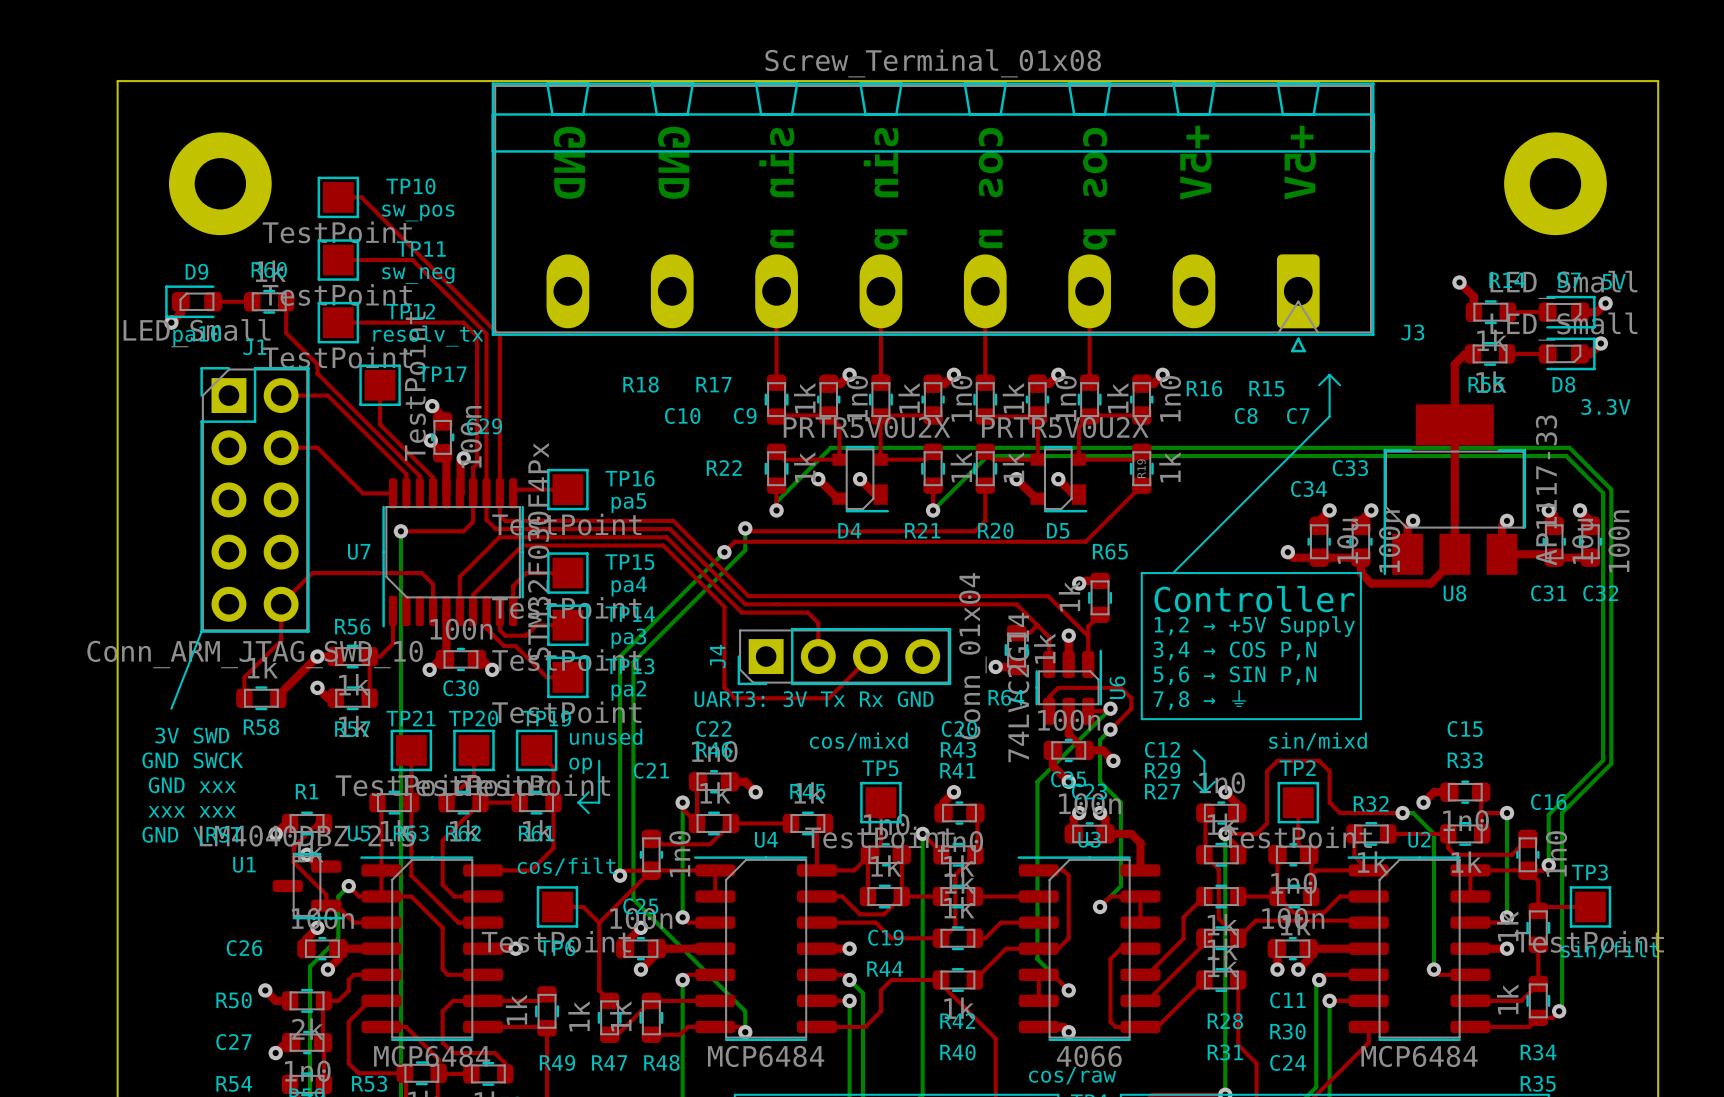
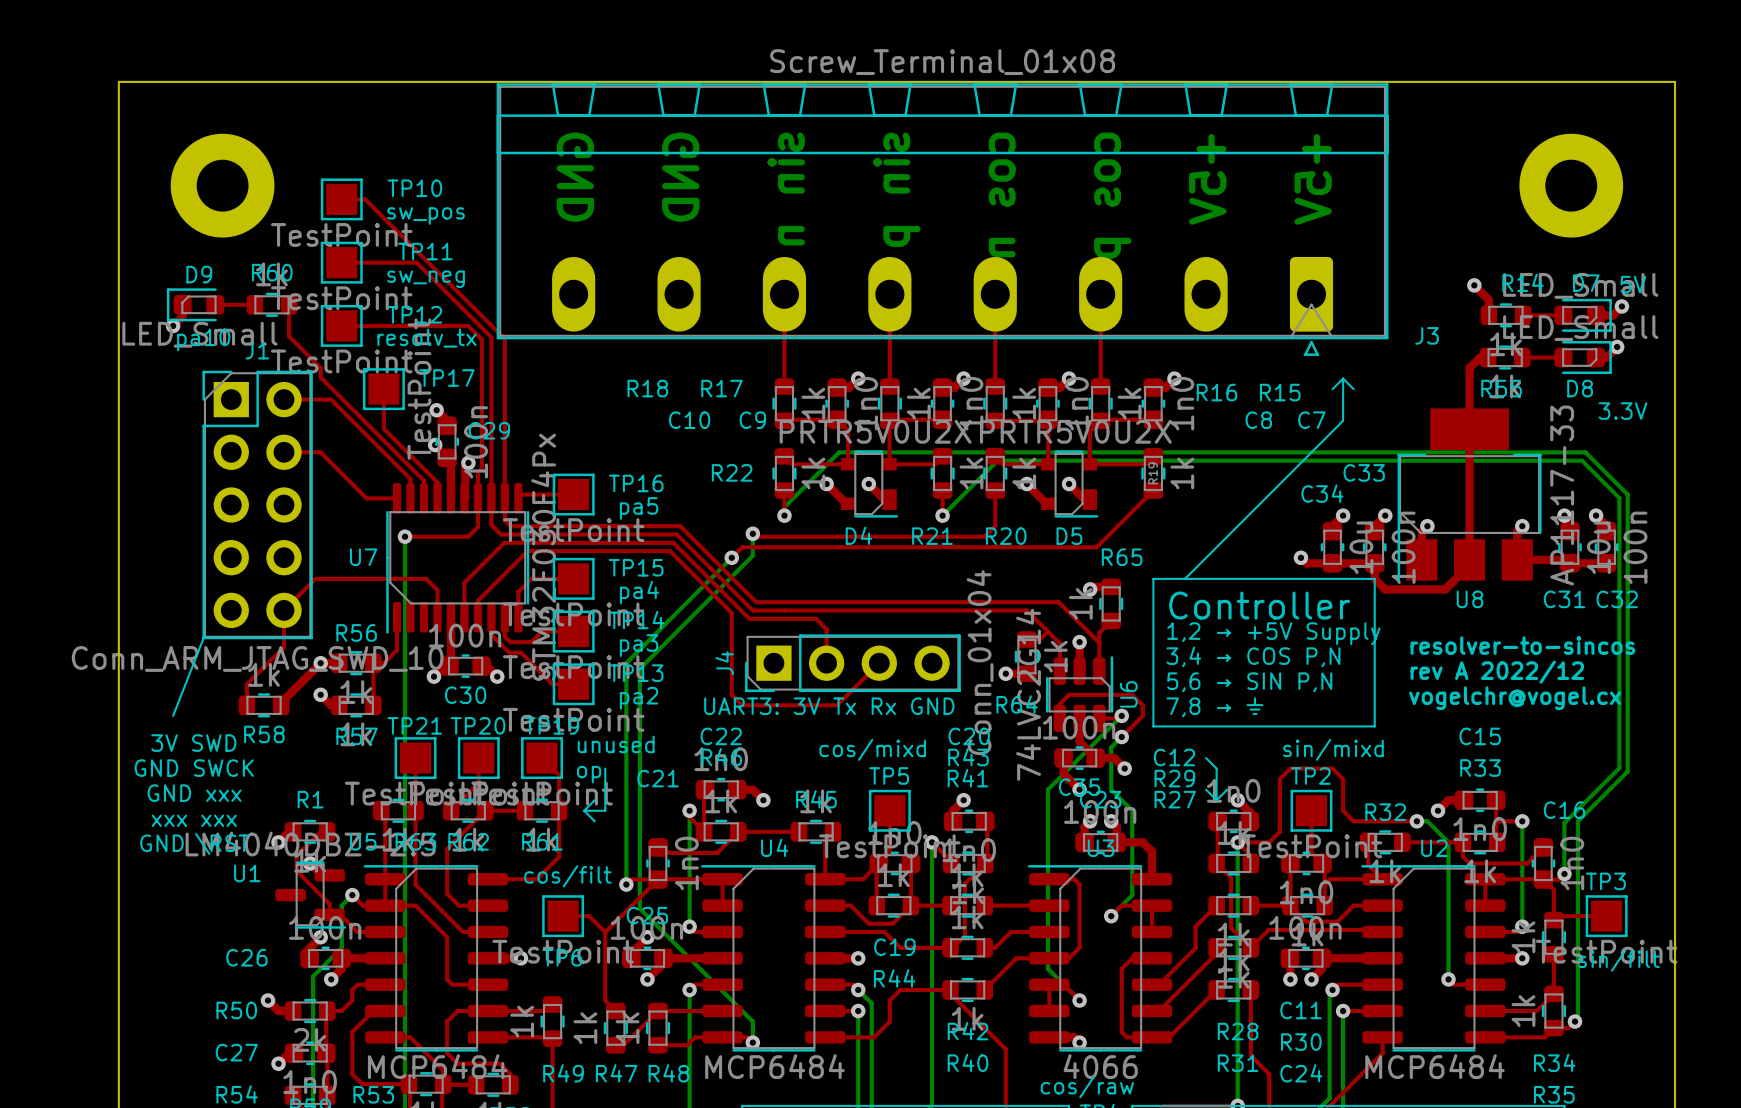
text: none -> resolver-to-sincos (1522, 645)
text: none -> rev A 2022/12 (1497, 672)
text: none -> vogelchr@vogel.cx (1515, 698)

